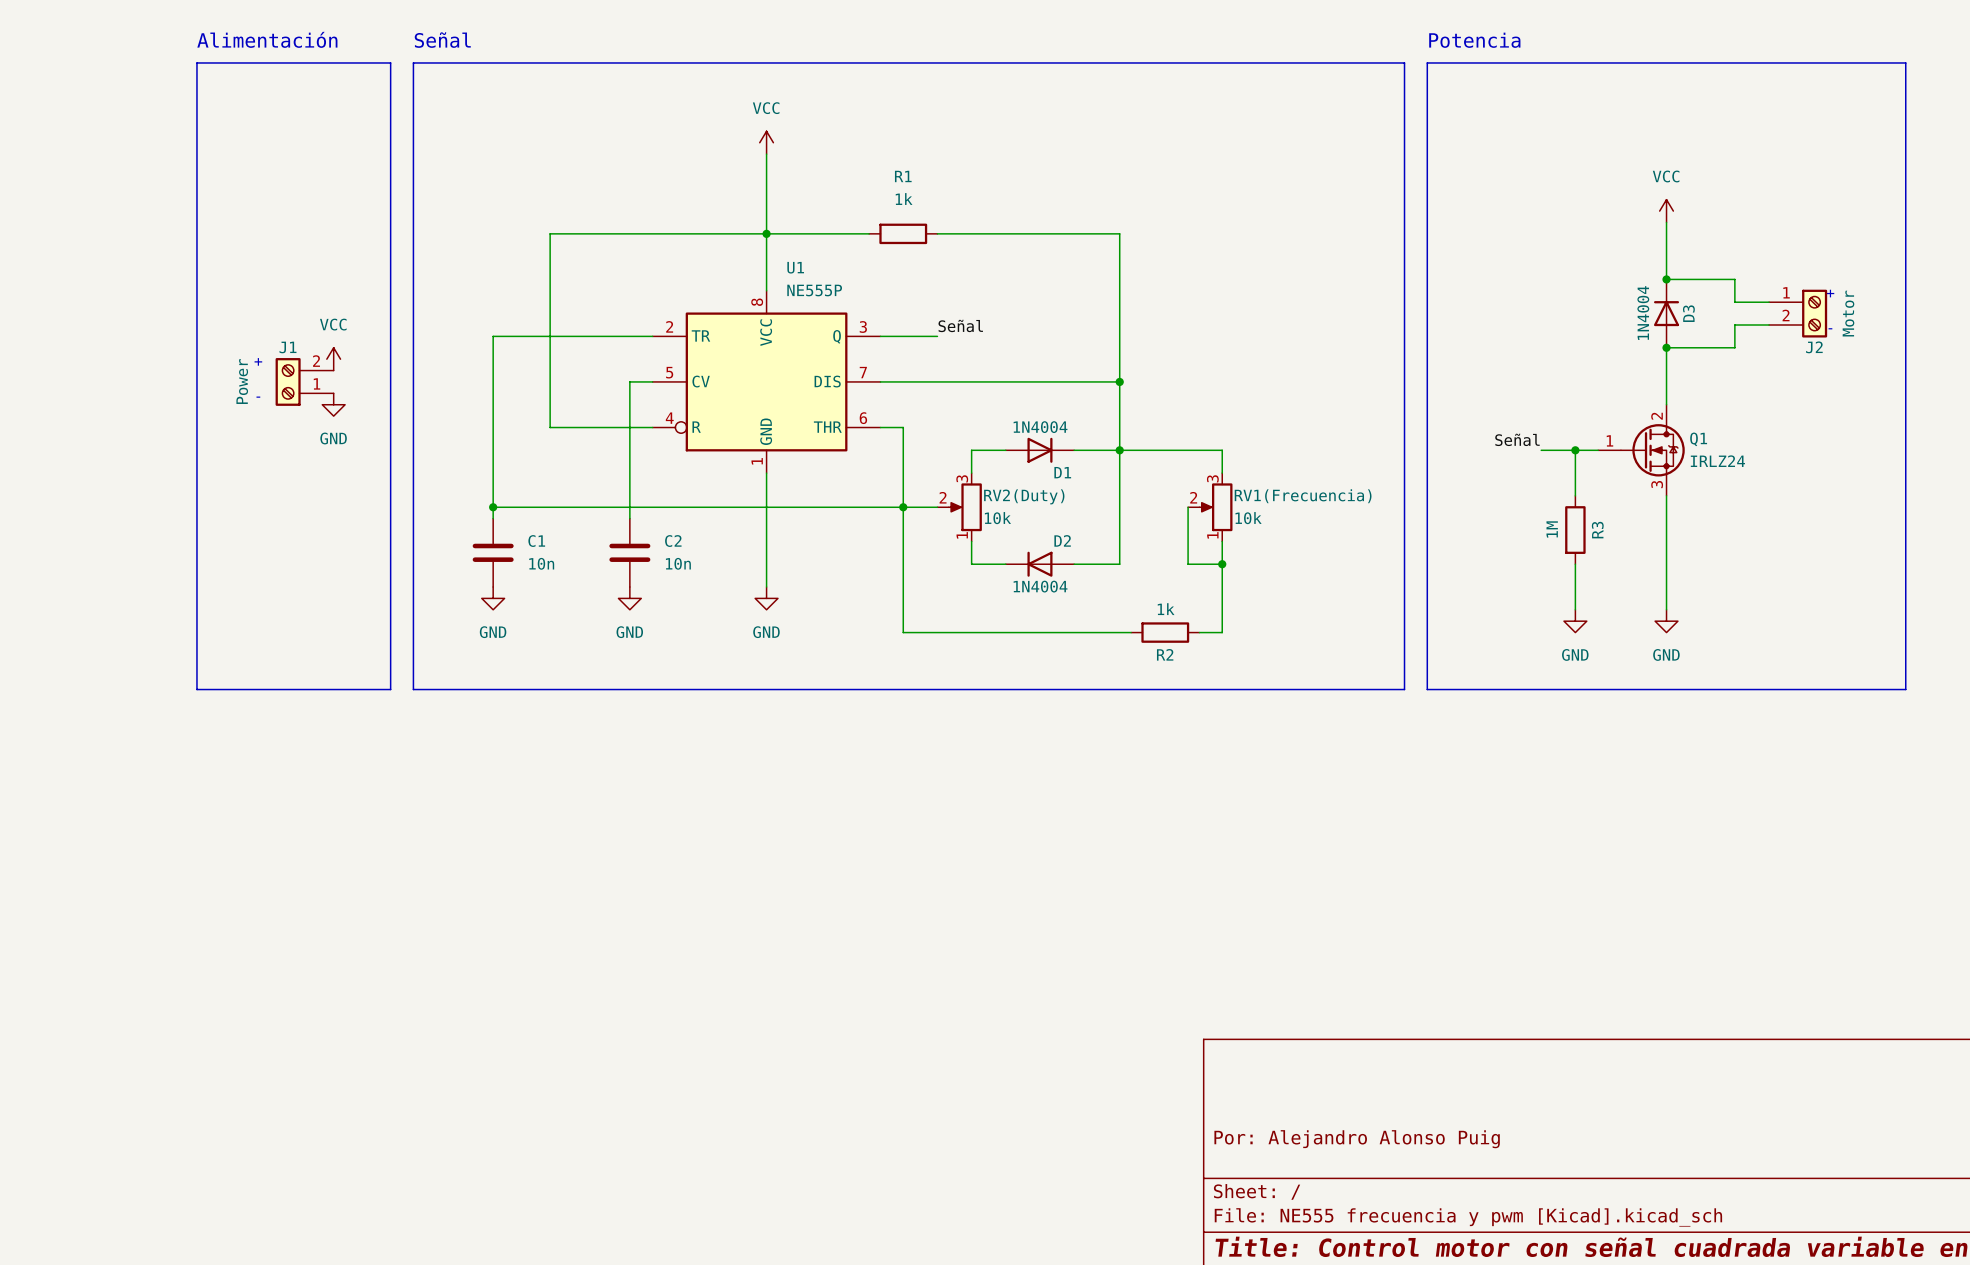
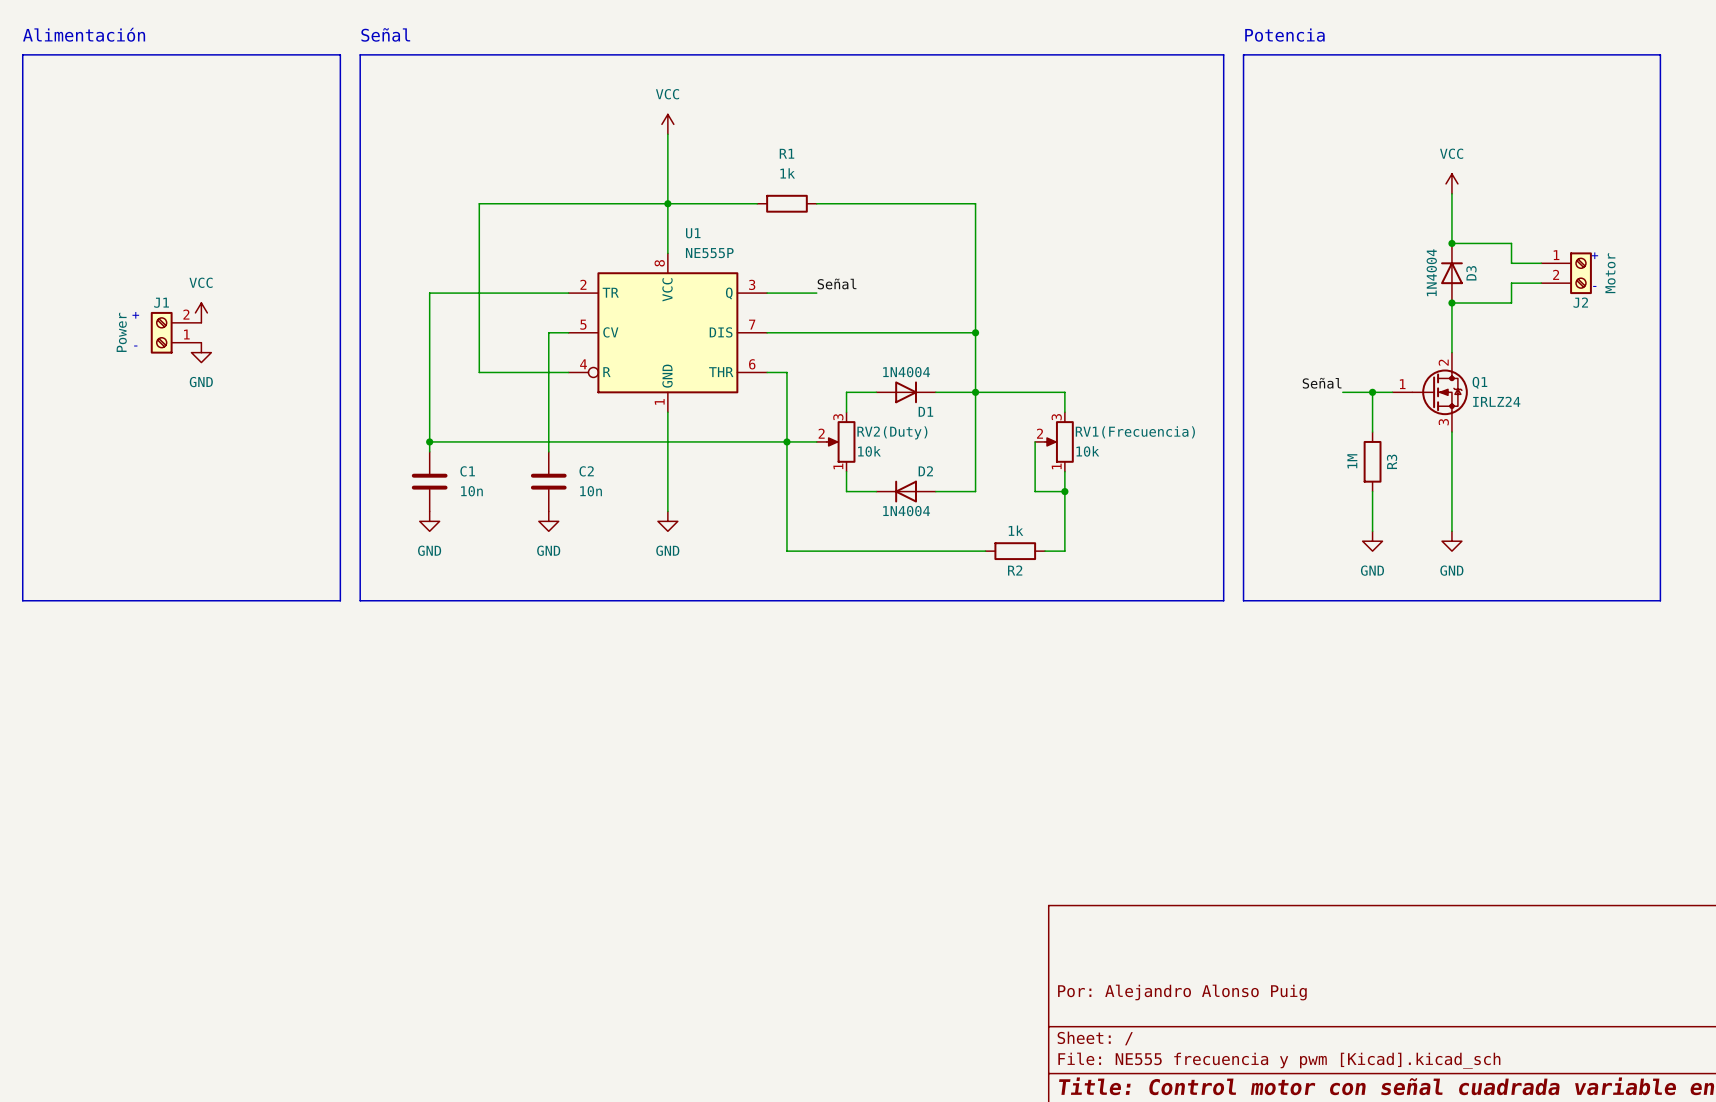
text position: Alimentación (267, 39) -> Alimentación (84, 34)
line: (196, 62) (196, 689) -> (171, 54) (22, 54) (22, 600) (171, 600)
power symbol position: VCC (333, 359) -> VCC (201, 312)
text position: + (258, 361) -> + (135, 315)
J1 position: (304, 381) -> (176, 332)
text position: - (258, 397) -> - (135, 346)
power symbol position: GND (333, 404) -> GND (201, 352)

